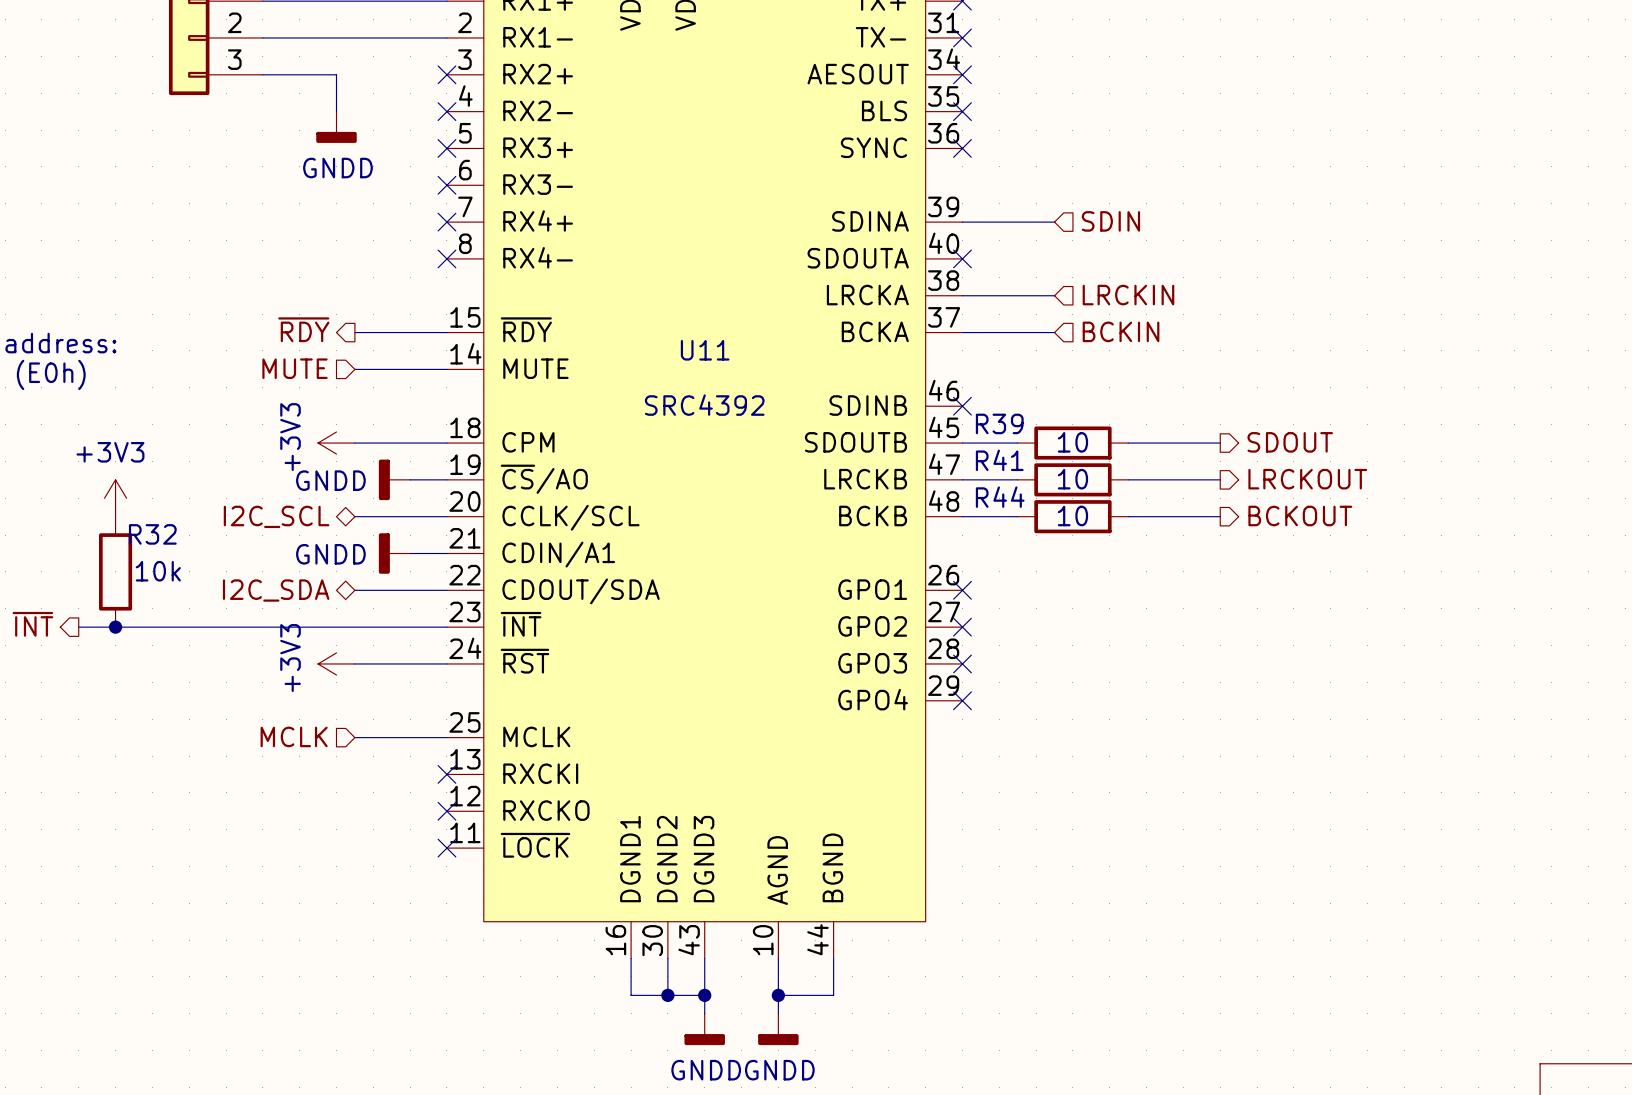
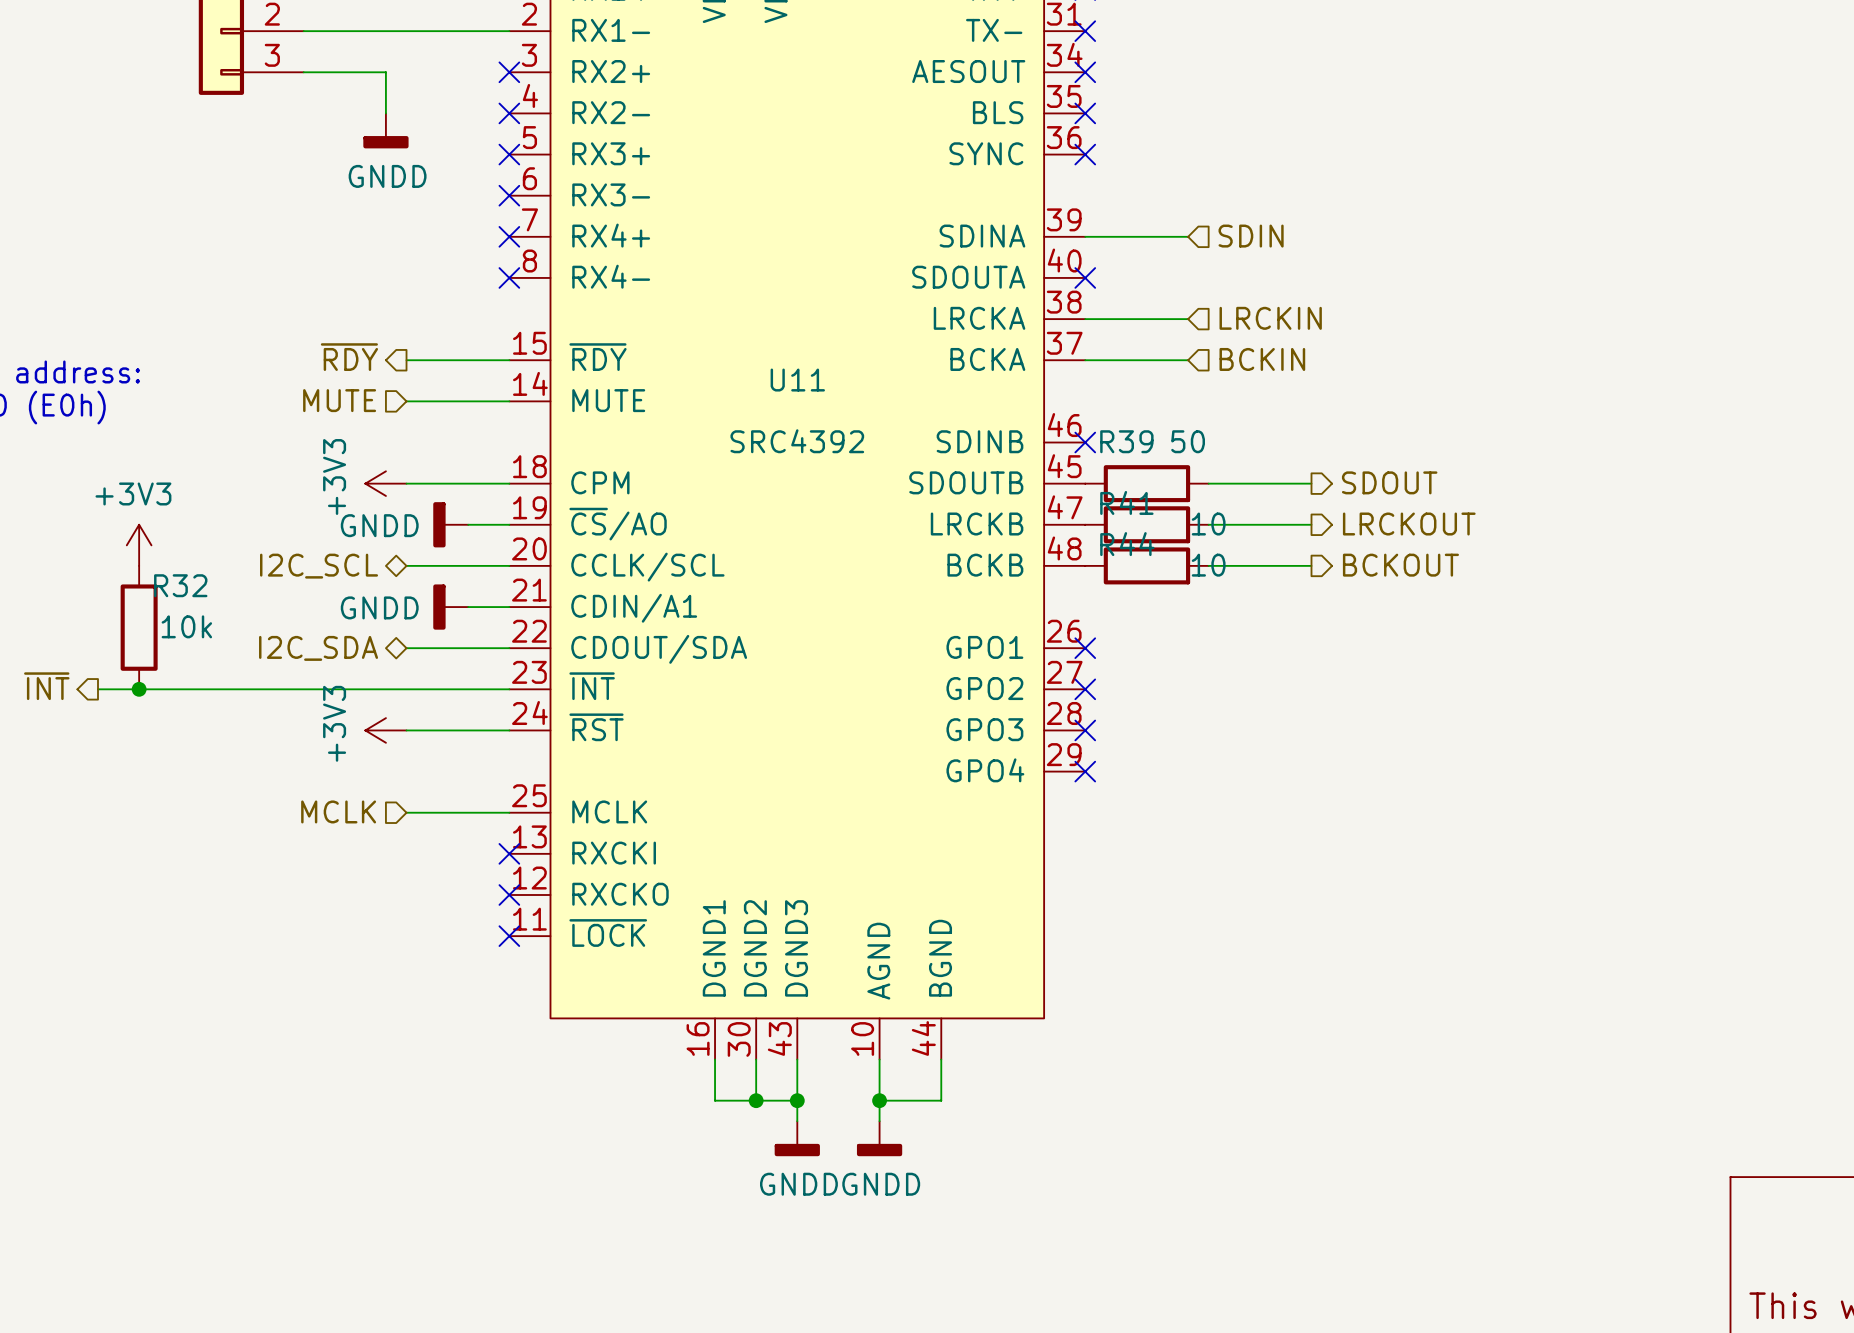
R39 name position: R39 (999, 423) -> R39 (1126, 441)
R39 value: 10 (1072, 442) -> 50 (1188, 441)
hierarchical label position: SDOUT (1290, 442) -> SDOUT (1389, 482)
wire: (962, 443) (1017, 443) -> none
R39 position: (1072, 443) -> (1146, 483)
wire: (1165, 443) (1220, 443) -> (1208, 483) (1270, 483)
wire: (962, 479) (1017, 479) -> none
R41 position: (1072, 479) -> (1146, 524)
wire: (1165, 479) (1220, 479) -> (1208, 524) (1270, 524)
hierarchical label position: LRCKOUT (1307, 479) -> LRCKOUT (1409, 524)
hierarchical label position: BCKOUT (1300, 515) -> BCKOUT (1400, 565)
wire: (962, 516) (1017, 516) -> none
R44 position: (1072, 516) -> (1146, 565)
wire: (1165, 516) (1220, 516) -> (1208, 565) (1270, 565)

